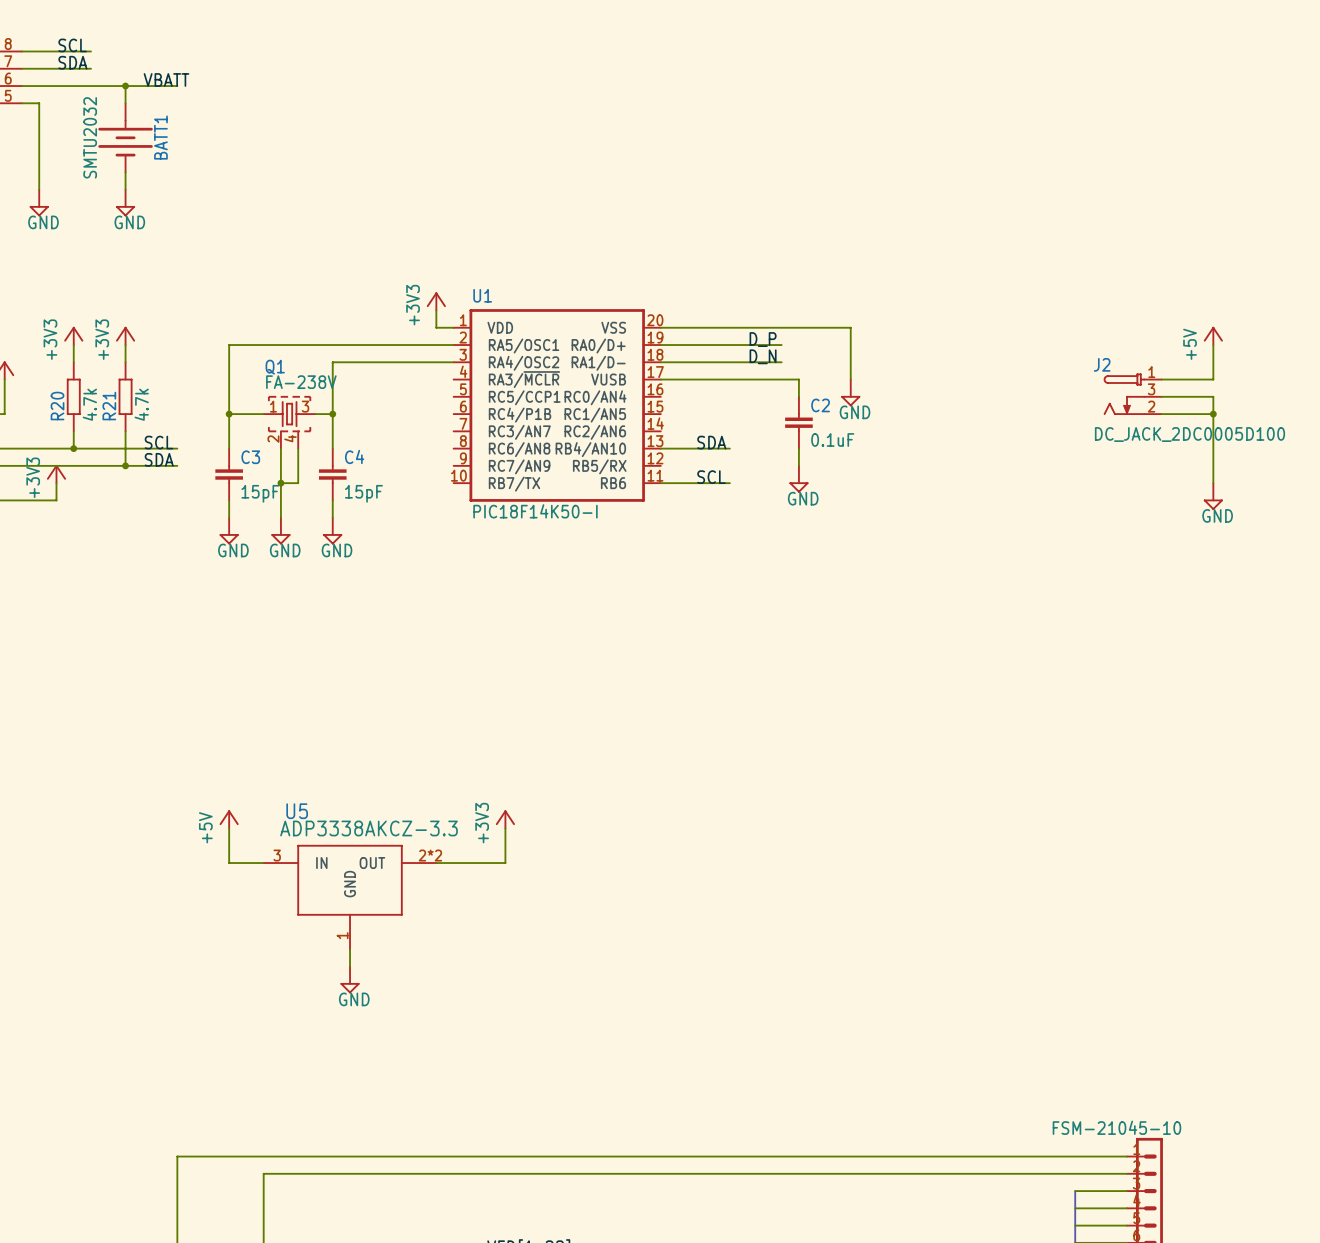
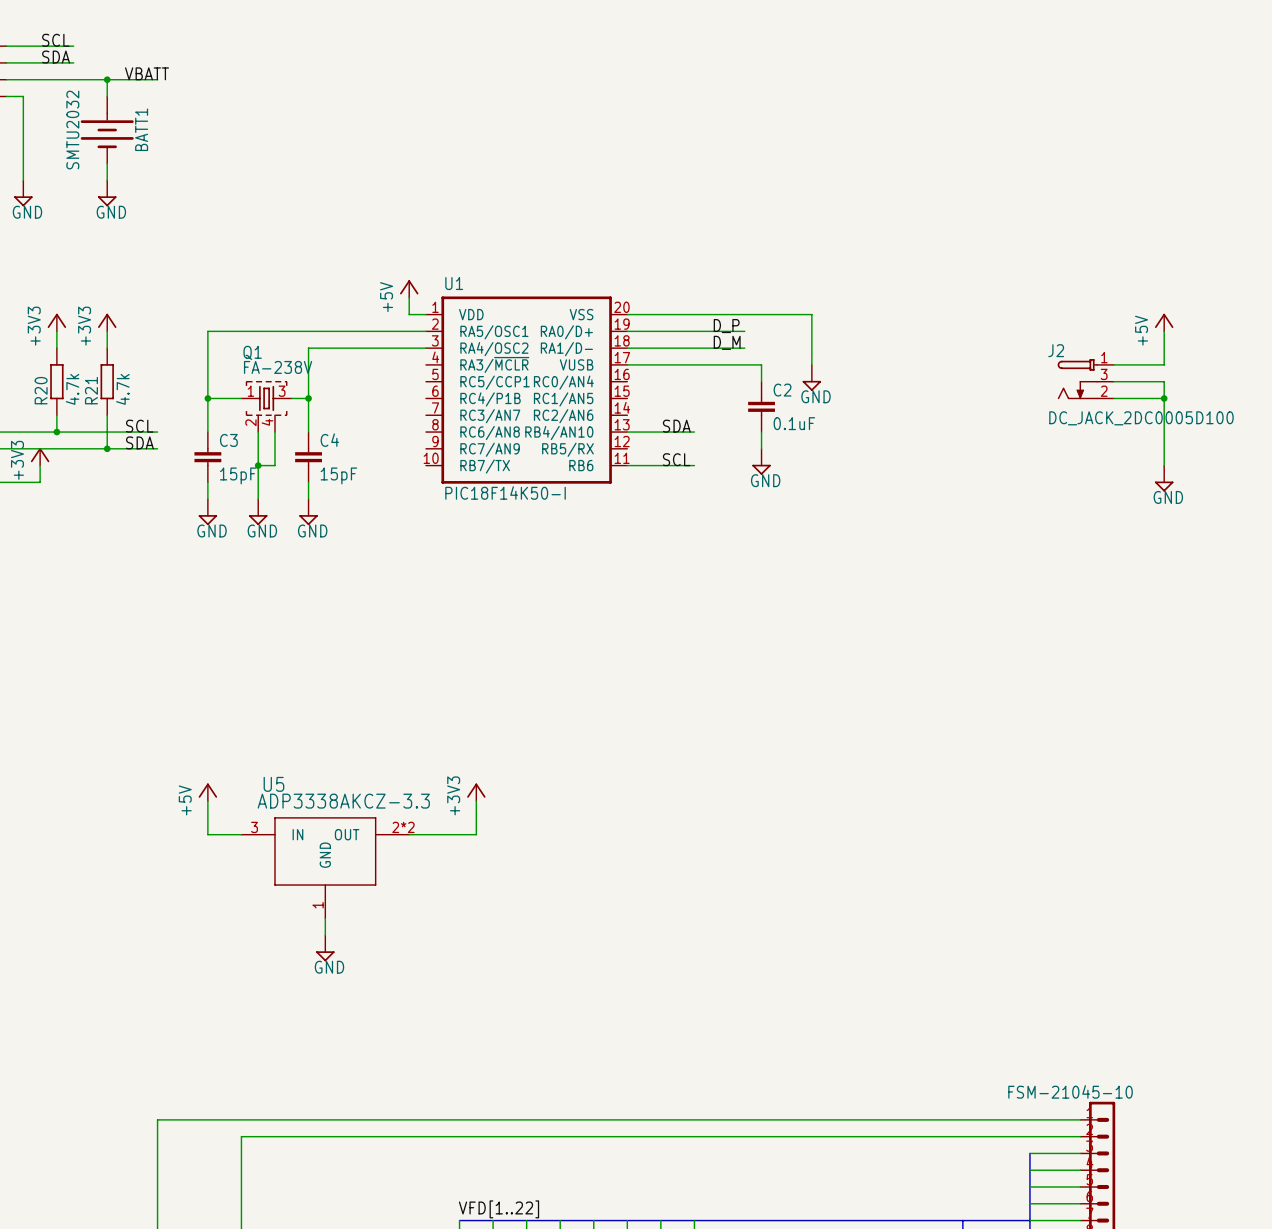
power symbol: +3V3 (436, 301) -> +5V (409, 289)
label: D_N (763, 356) -> D_M (727, 342)

